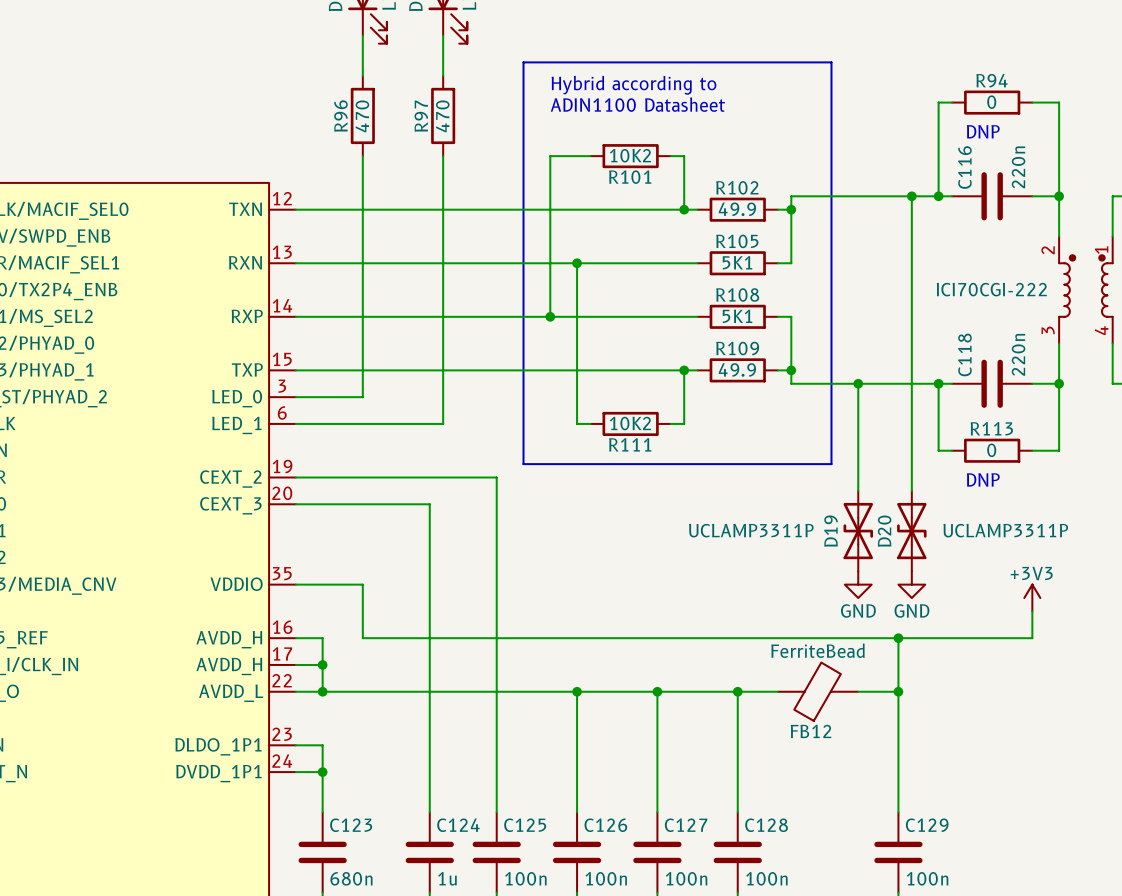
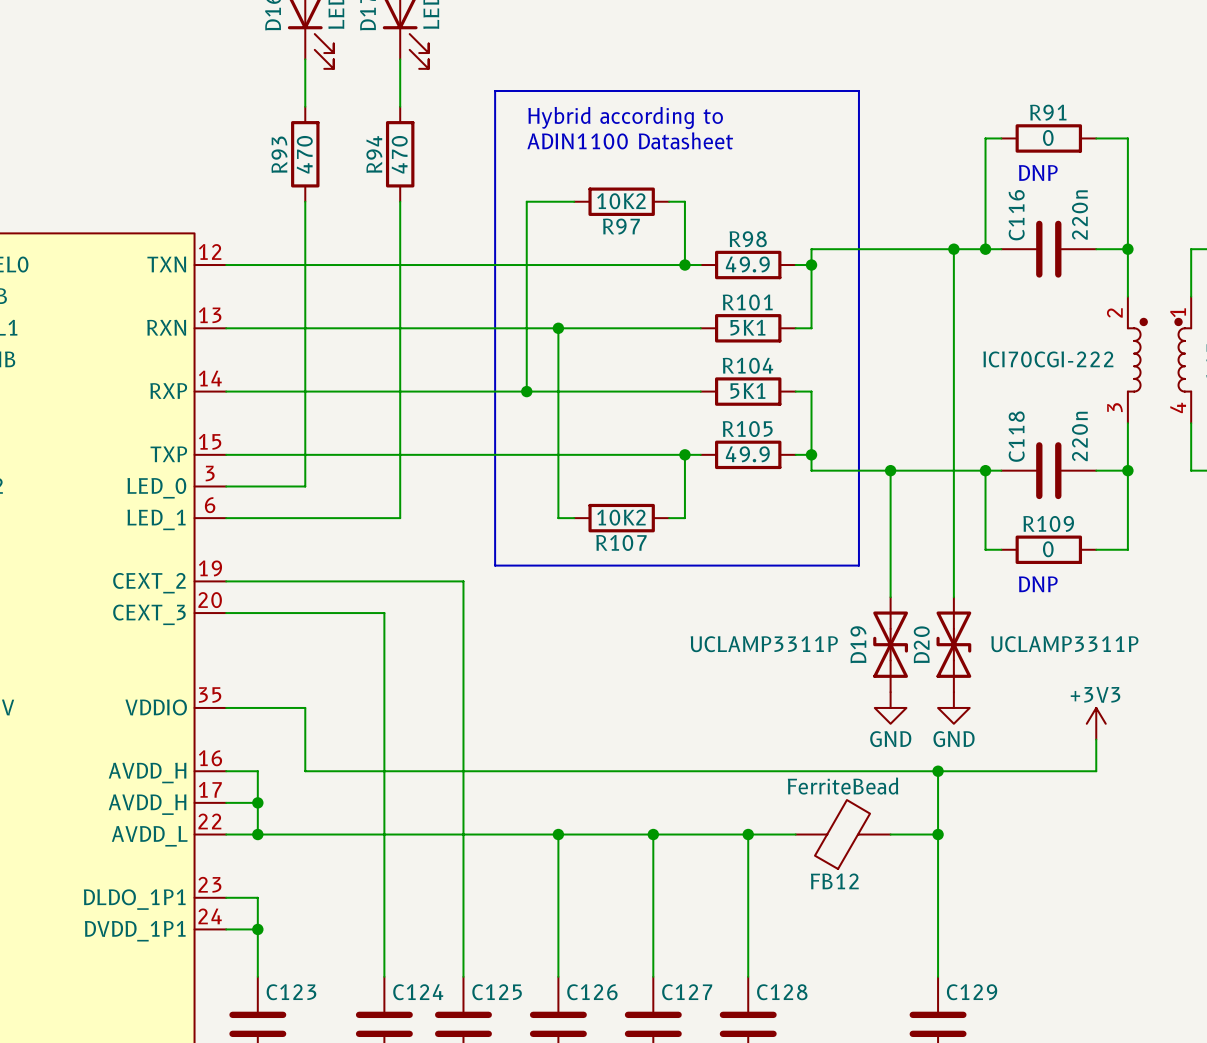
R94 name: R94 (991, 80) -> R91 (1048, 112)
R96 name: R96 (340, 116) -> R93 (279, 154)
R97 name: R97 (421, 116) -> R94 (374, 154)
R101 name: R101 (630, 177) -> R97 (621, 226)
R102 name: R102 (737, 187) -> R98 (748, 239)
R105 name: R105 (737, 241) -> R101 (747, 302)
R108 name: R108 (737, 294) -> R104 (747, 365)
R109 name: R109 (737, 348) -> R105 (747, 429)
R113 name: R113 (991, 428) -> R109 (1048, 523)
R111 name: R111 (630, 444) -> R107 (621, 542)

